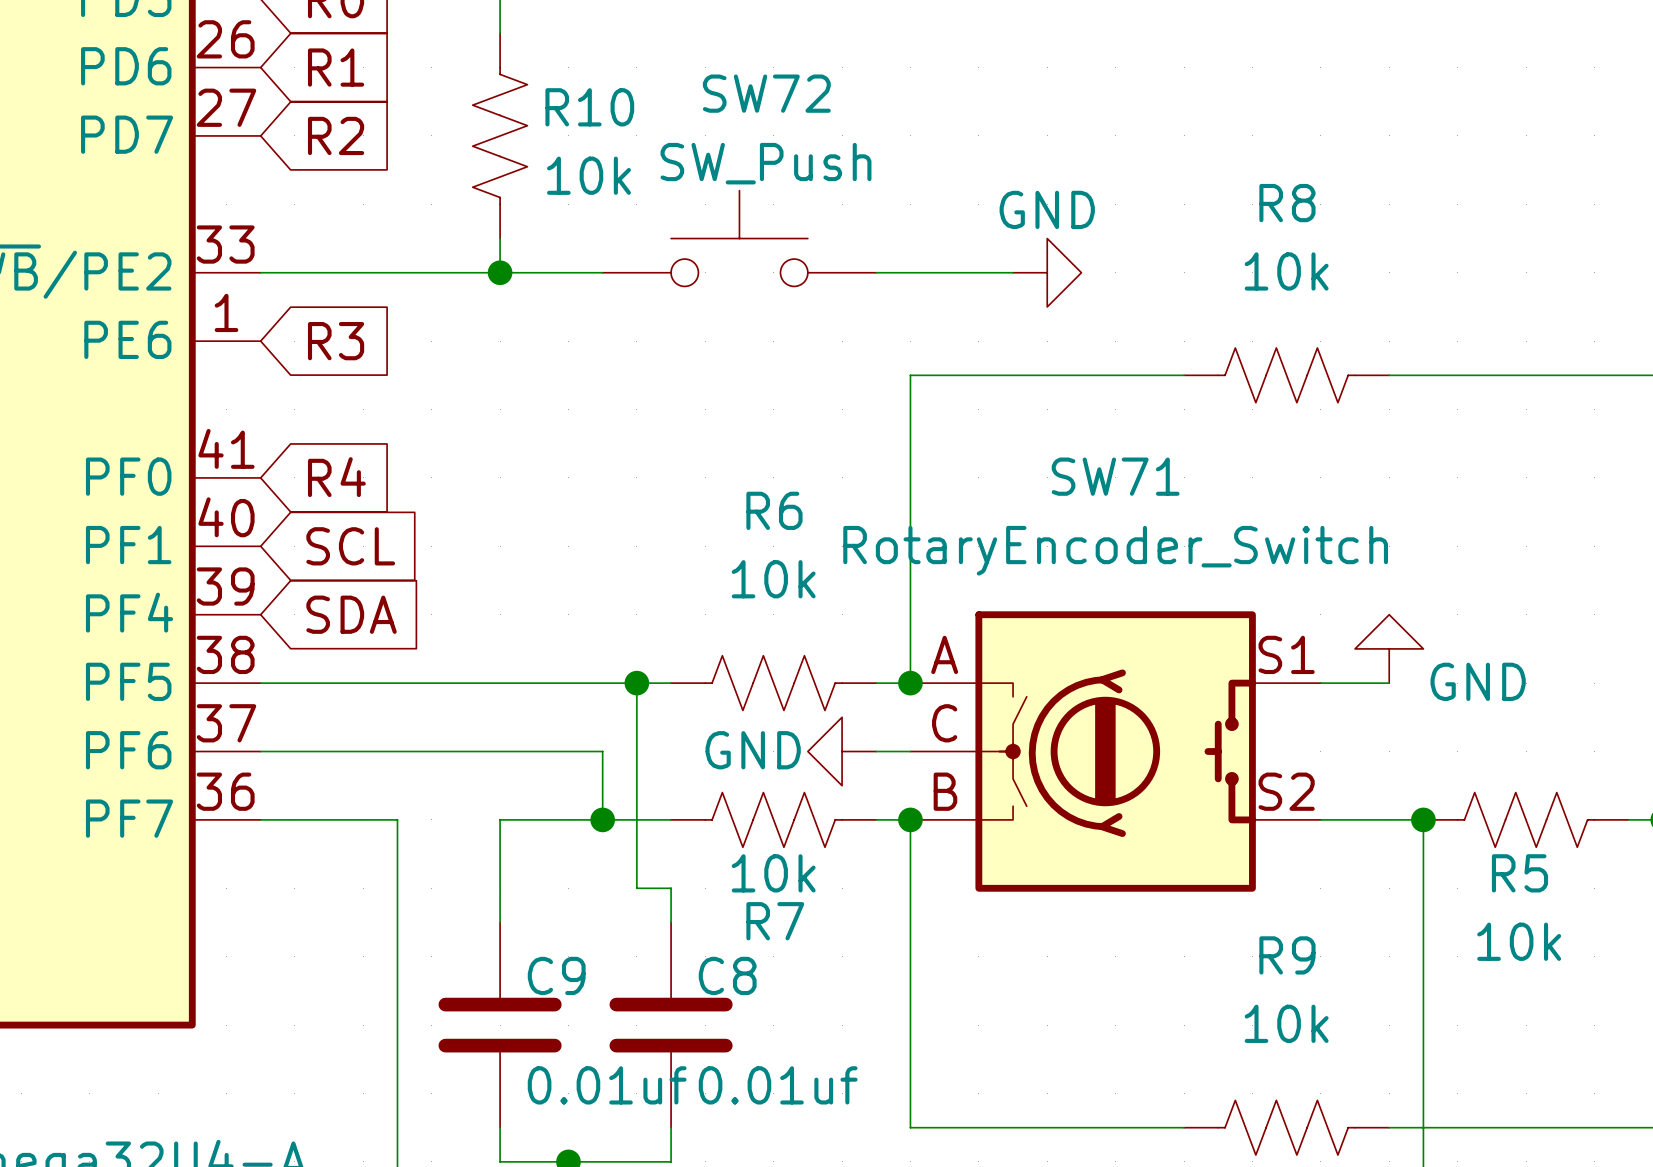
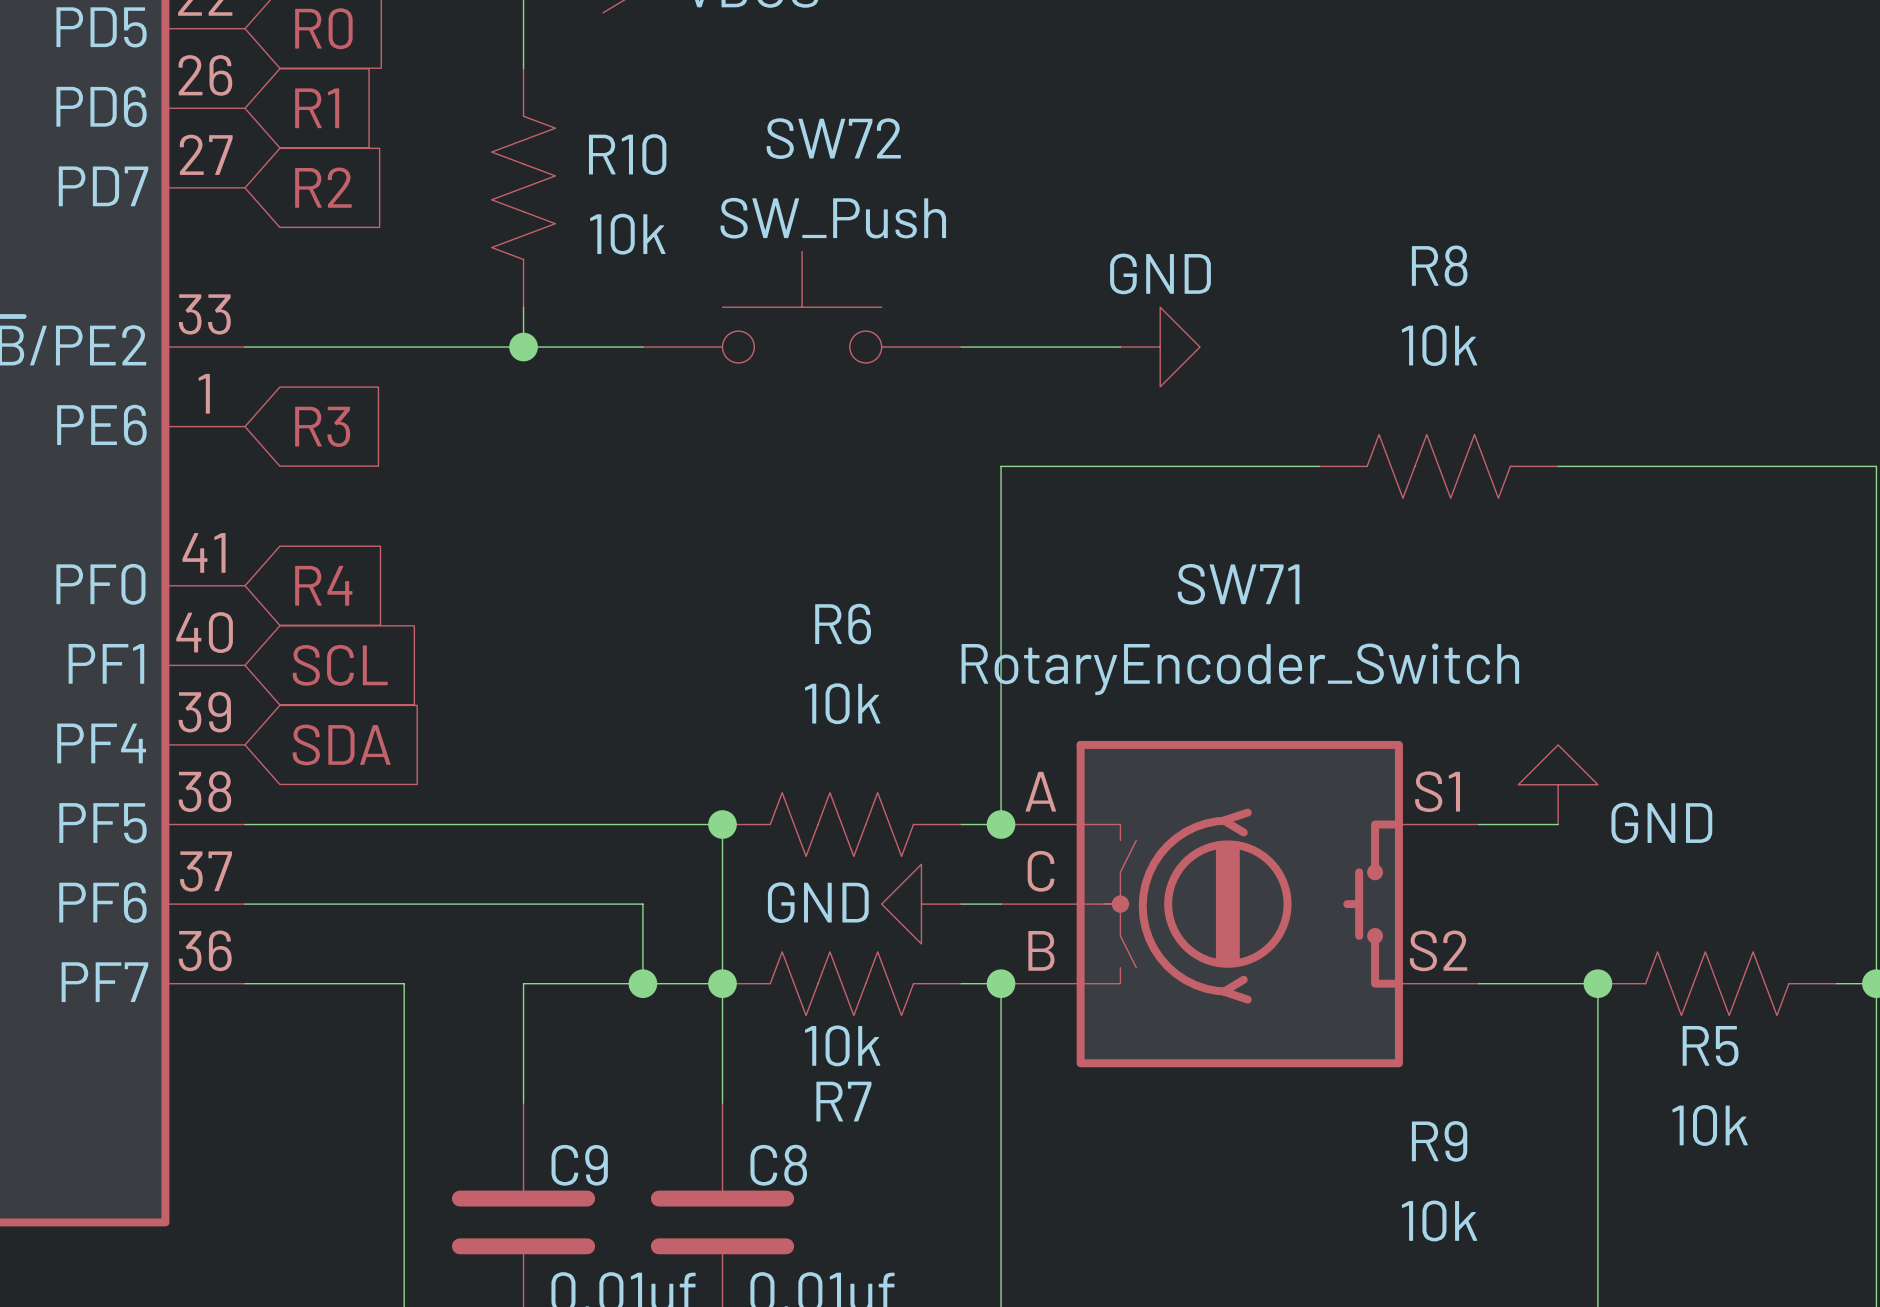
wire: (636, 683) (636, 888) (671, 888) -> (722, 824) (722, 1063)
junction position: (636, 683) -> (722, 824)
junction: none -> (722, 983)

